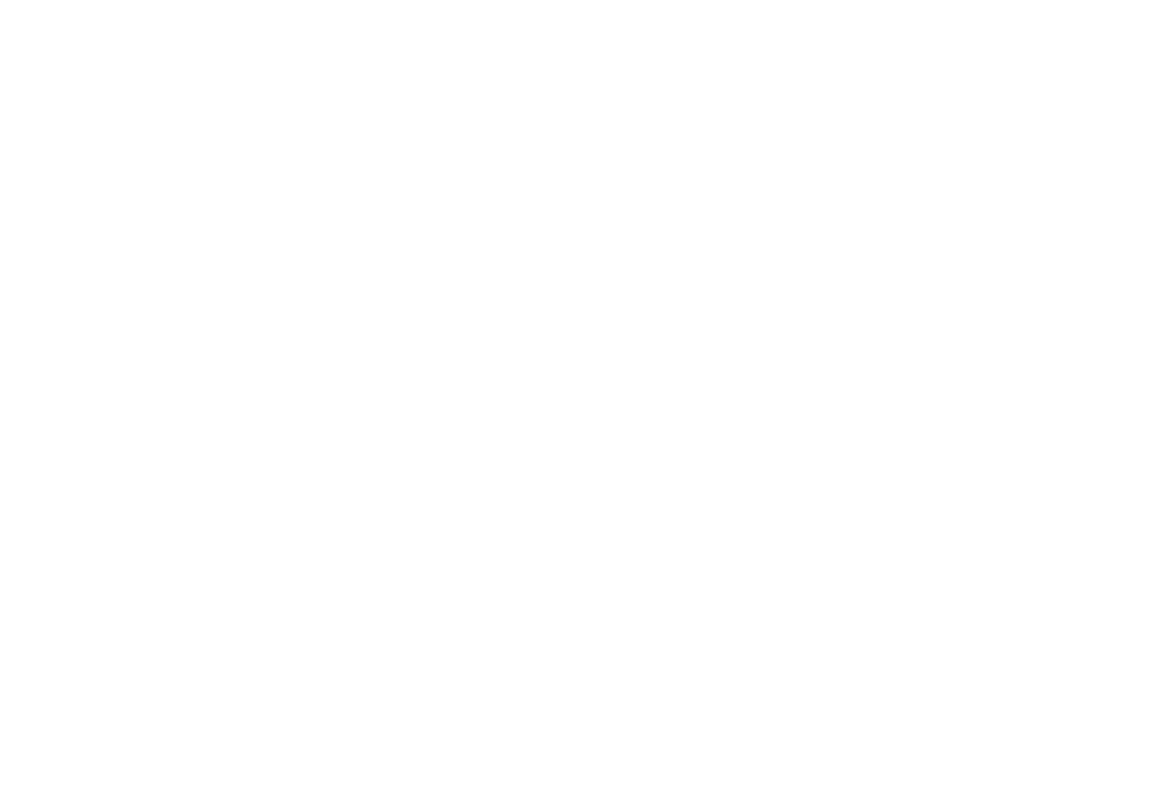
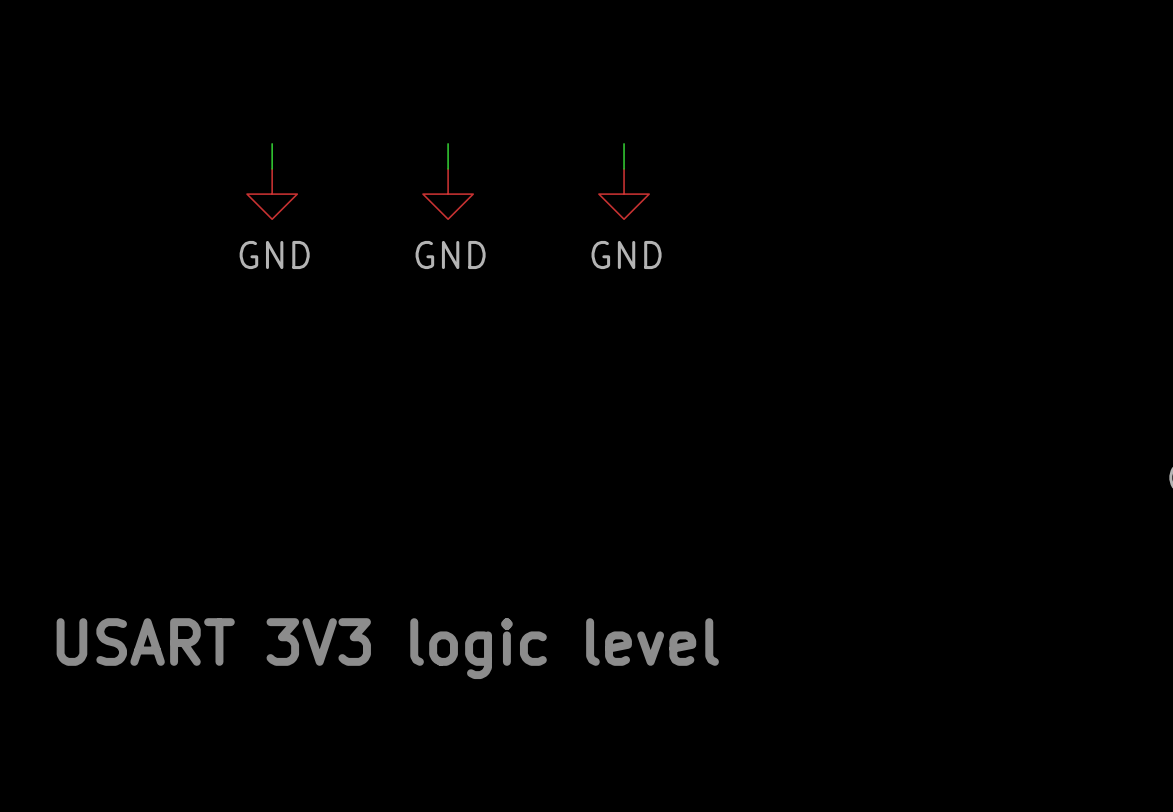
wire: none -> (272, 143) (272, 168)
wire: none -> (448, 143) (448, 168)
wire: none -> (624, 143) (624, 168)
power symbol: none -> GND (272, 194)
power symbol: none -> GND (448, 194)
power symbol: none -> GND (624, 194)
text: none -> USART 3V3 logic level (387, 648)

